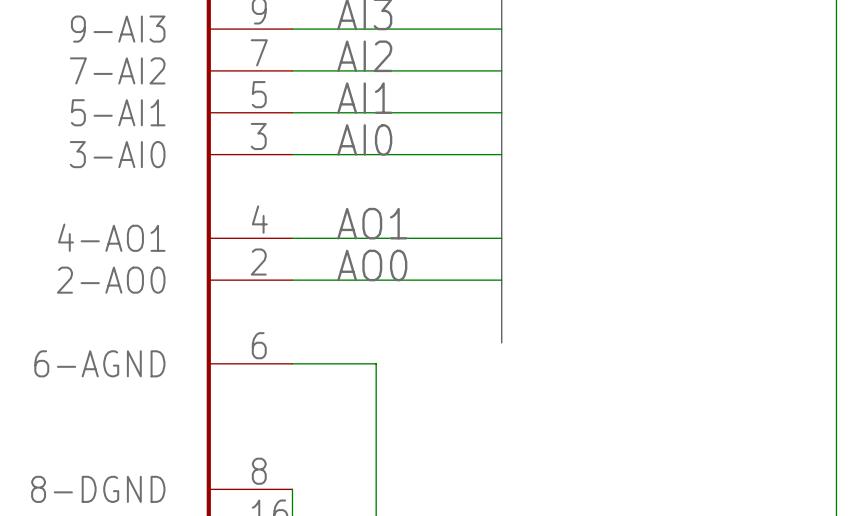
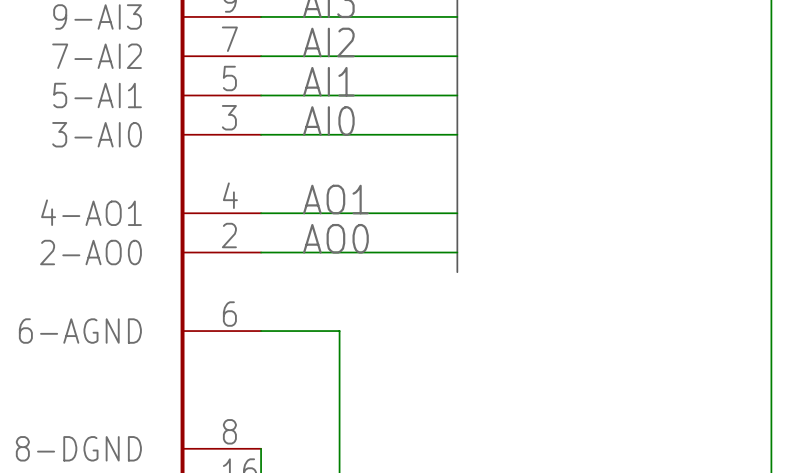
bus: (501, 301) (501, 342) -> none

